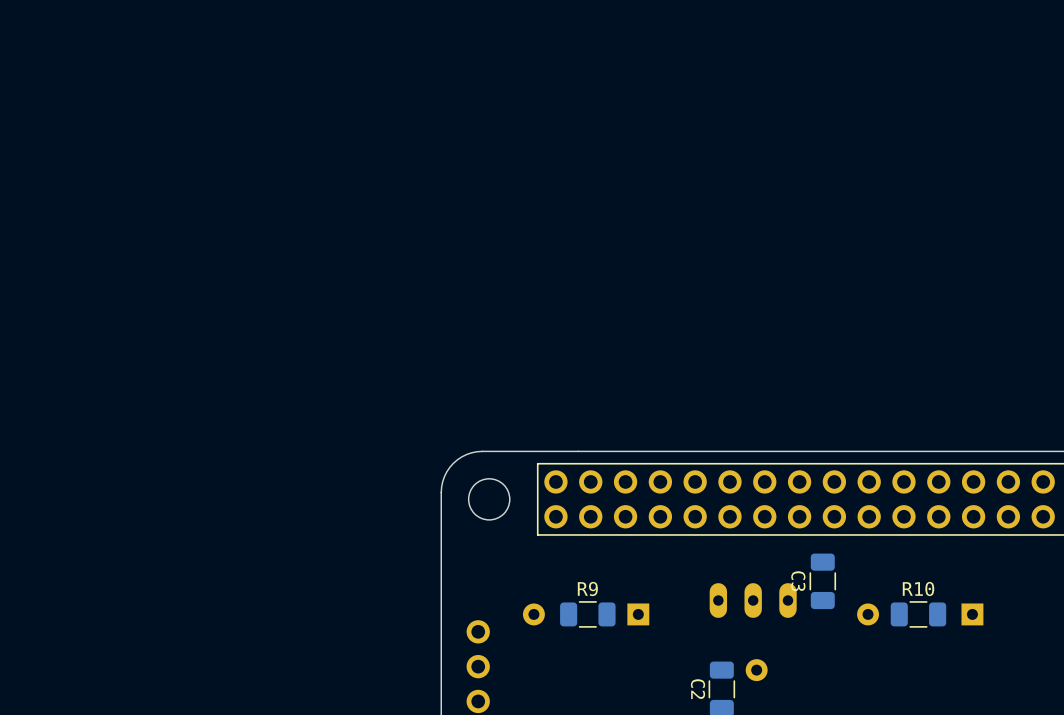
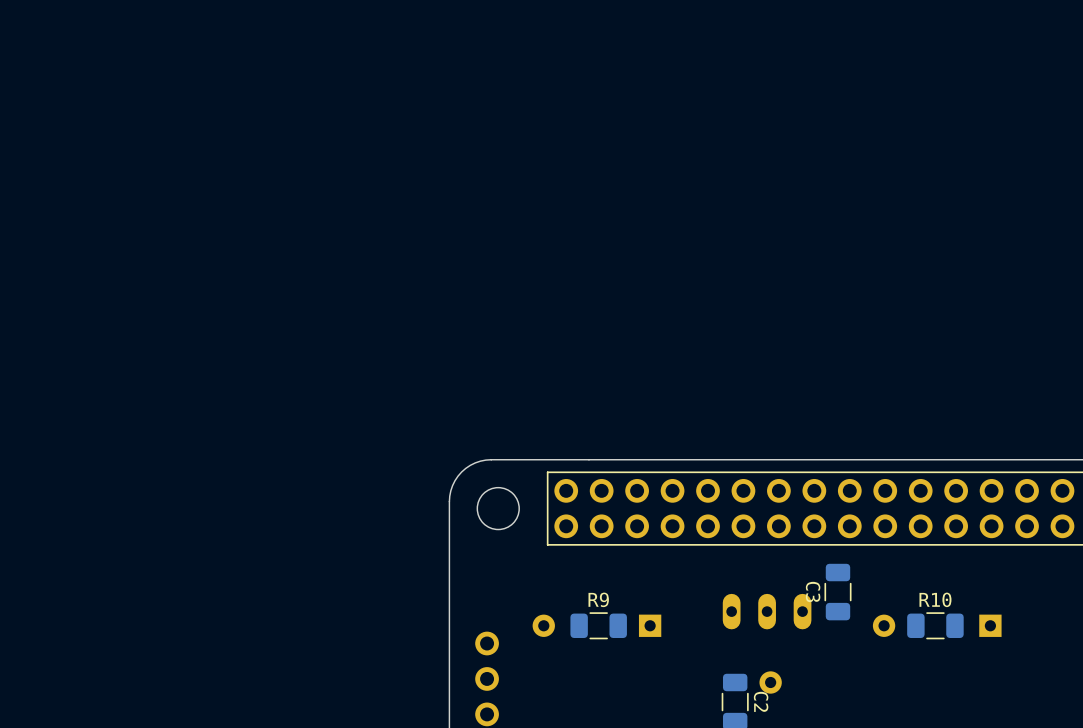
C2 name position: C2 (698, 689) -> C2 (761, 701)

